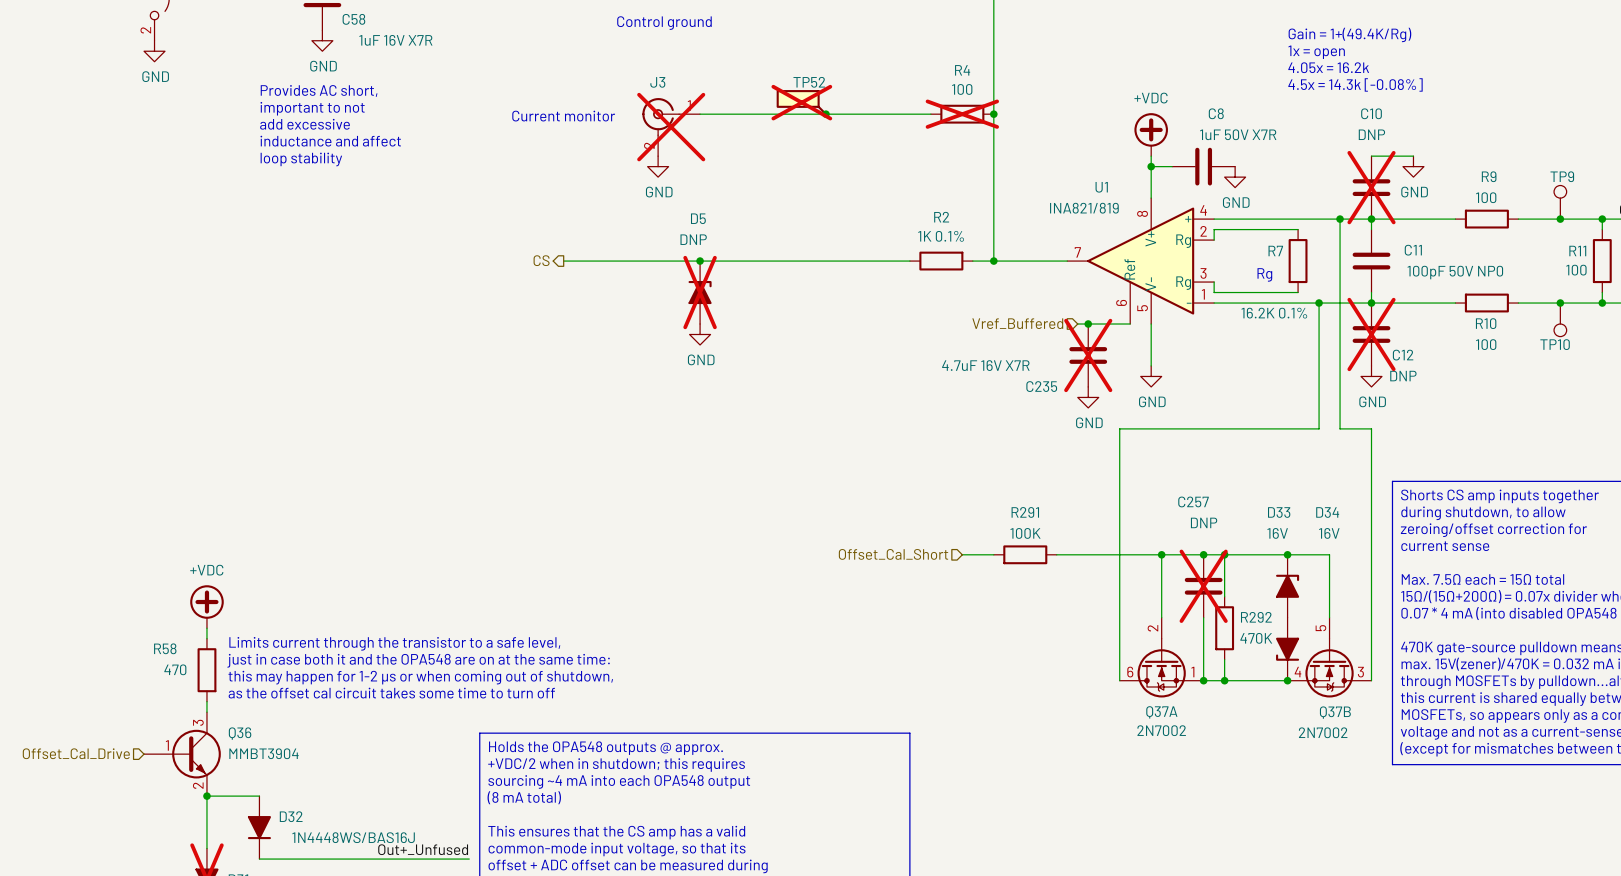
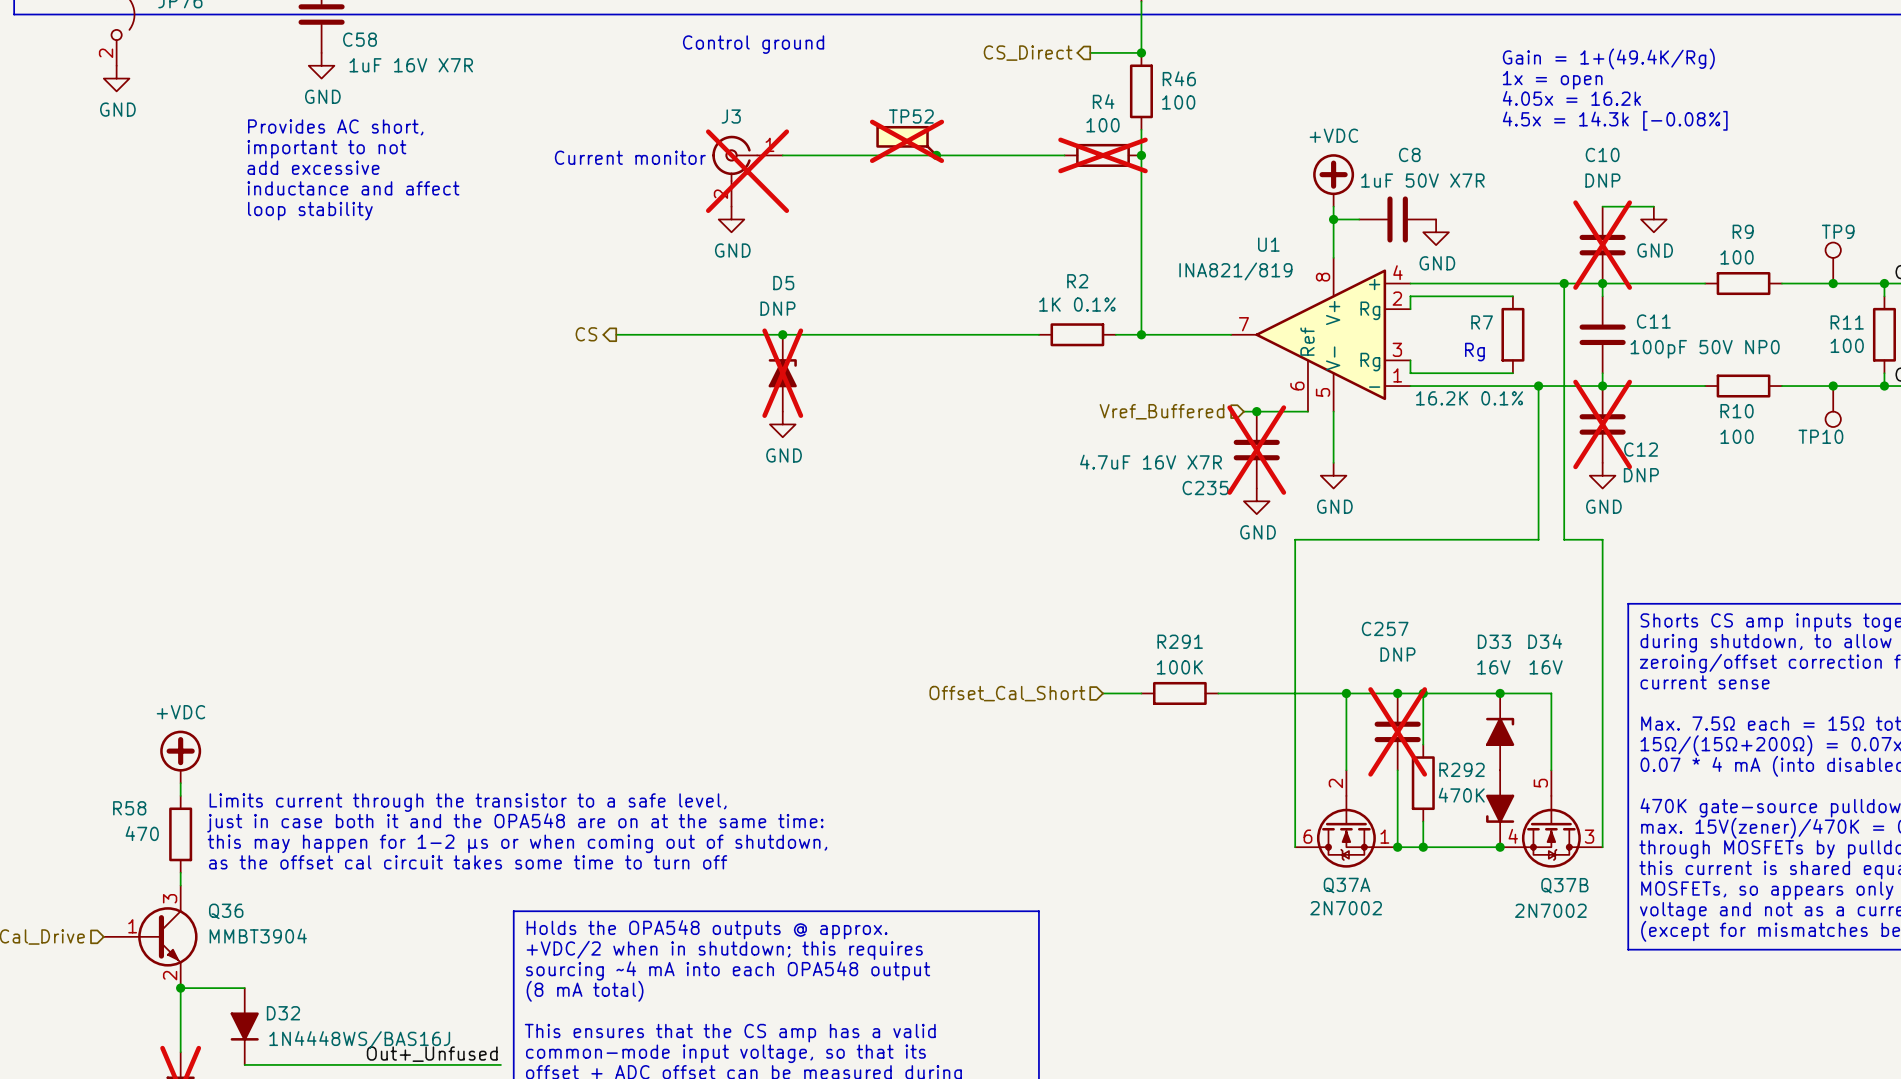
hierarchical label: none -> CS_Direct (1028, 53)
wire: (993, 30) (993, 93) -> (1141, 52) (1090, 52)
junction: none -> (1141, 52)
R46: none -> 100 (1141, 91)

